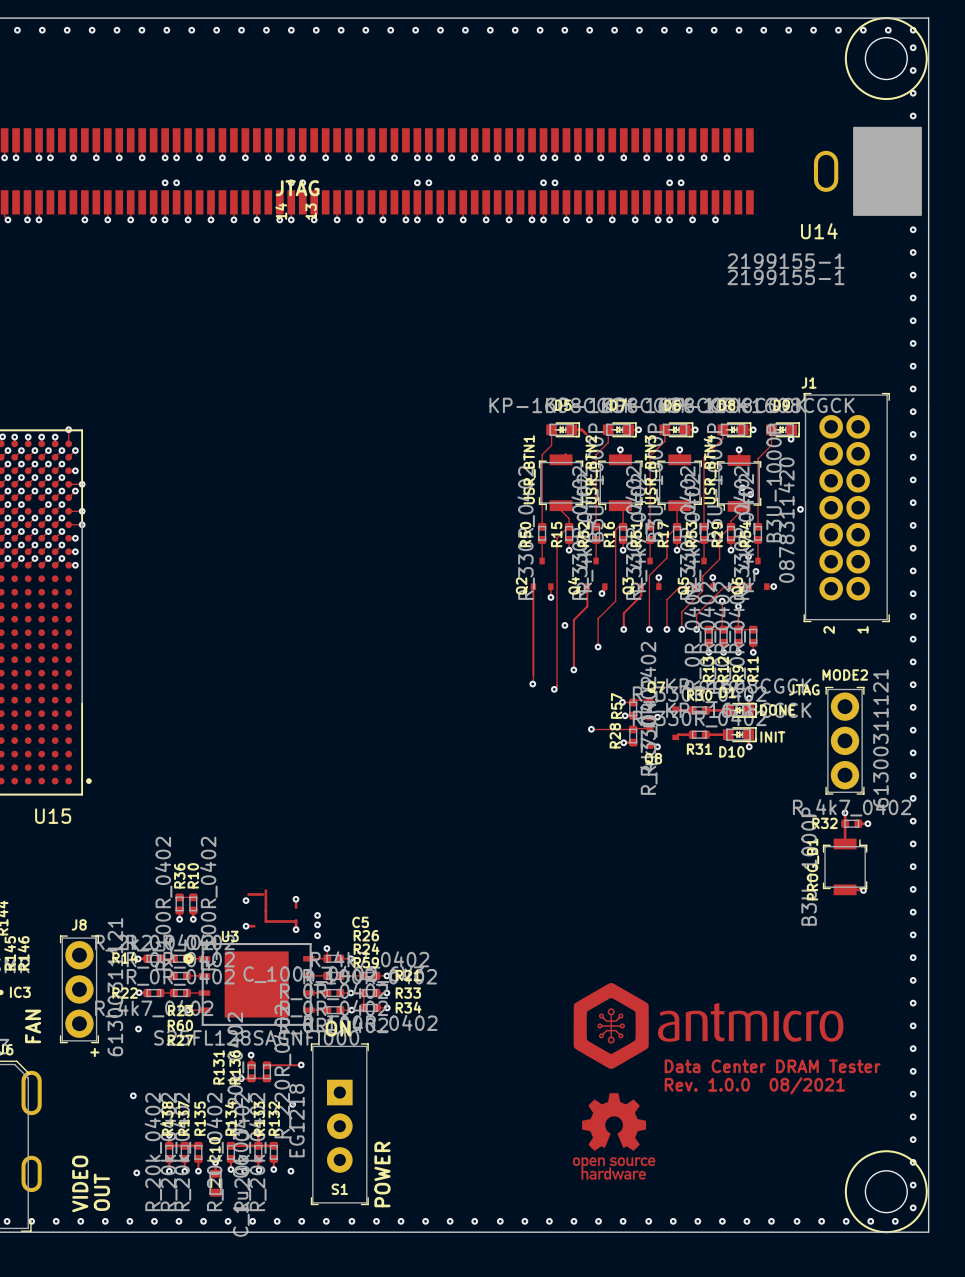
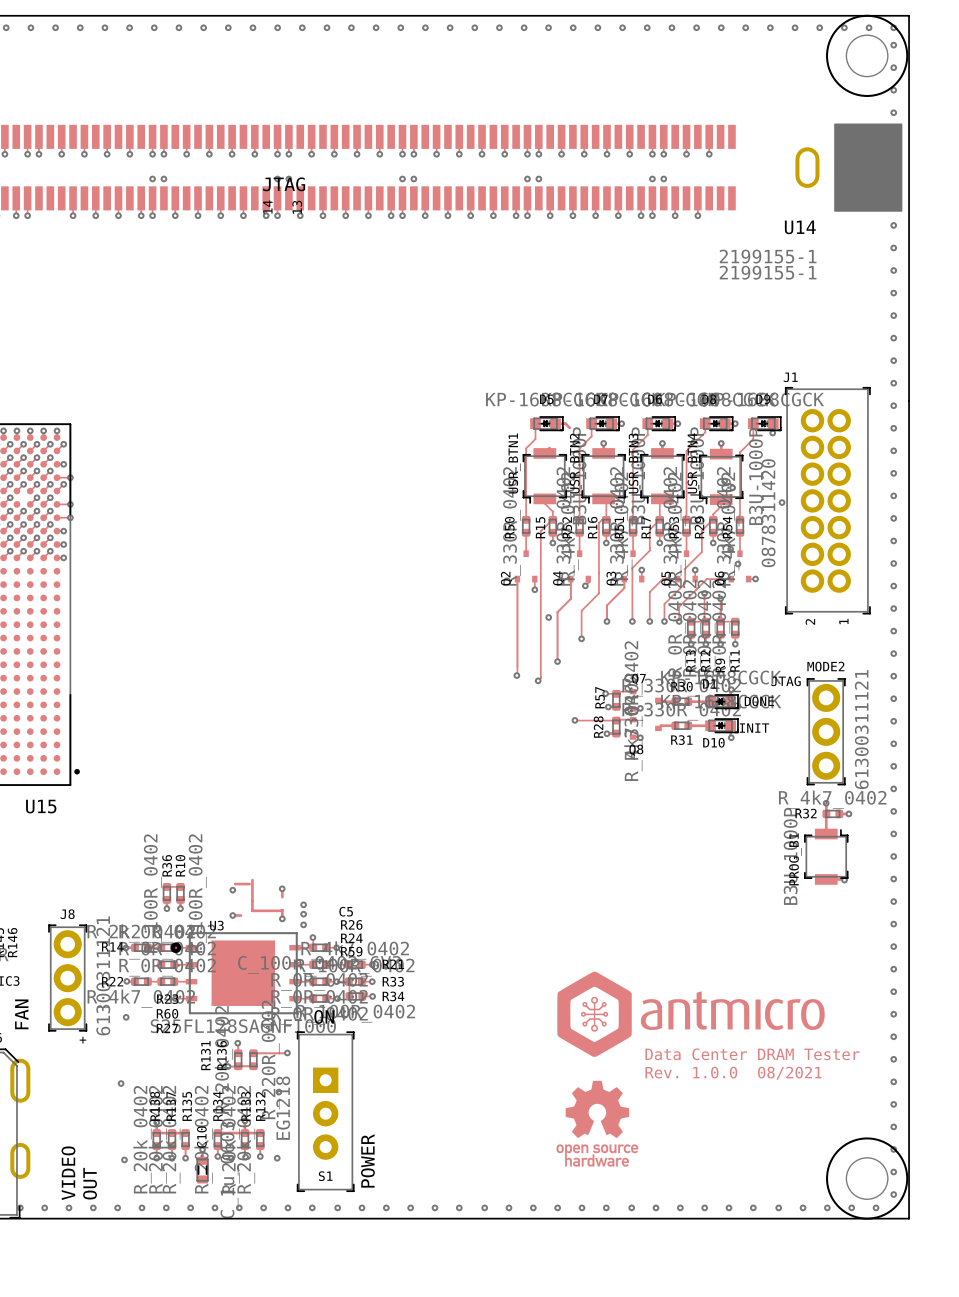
track: (68, 429) (68, 437) -> none
via: (68, 429) -> none
via: none -> (57, 430)

